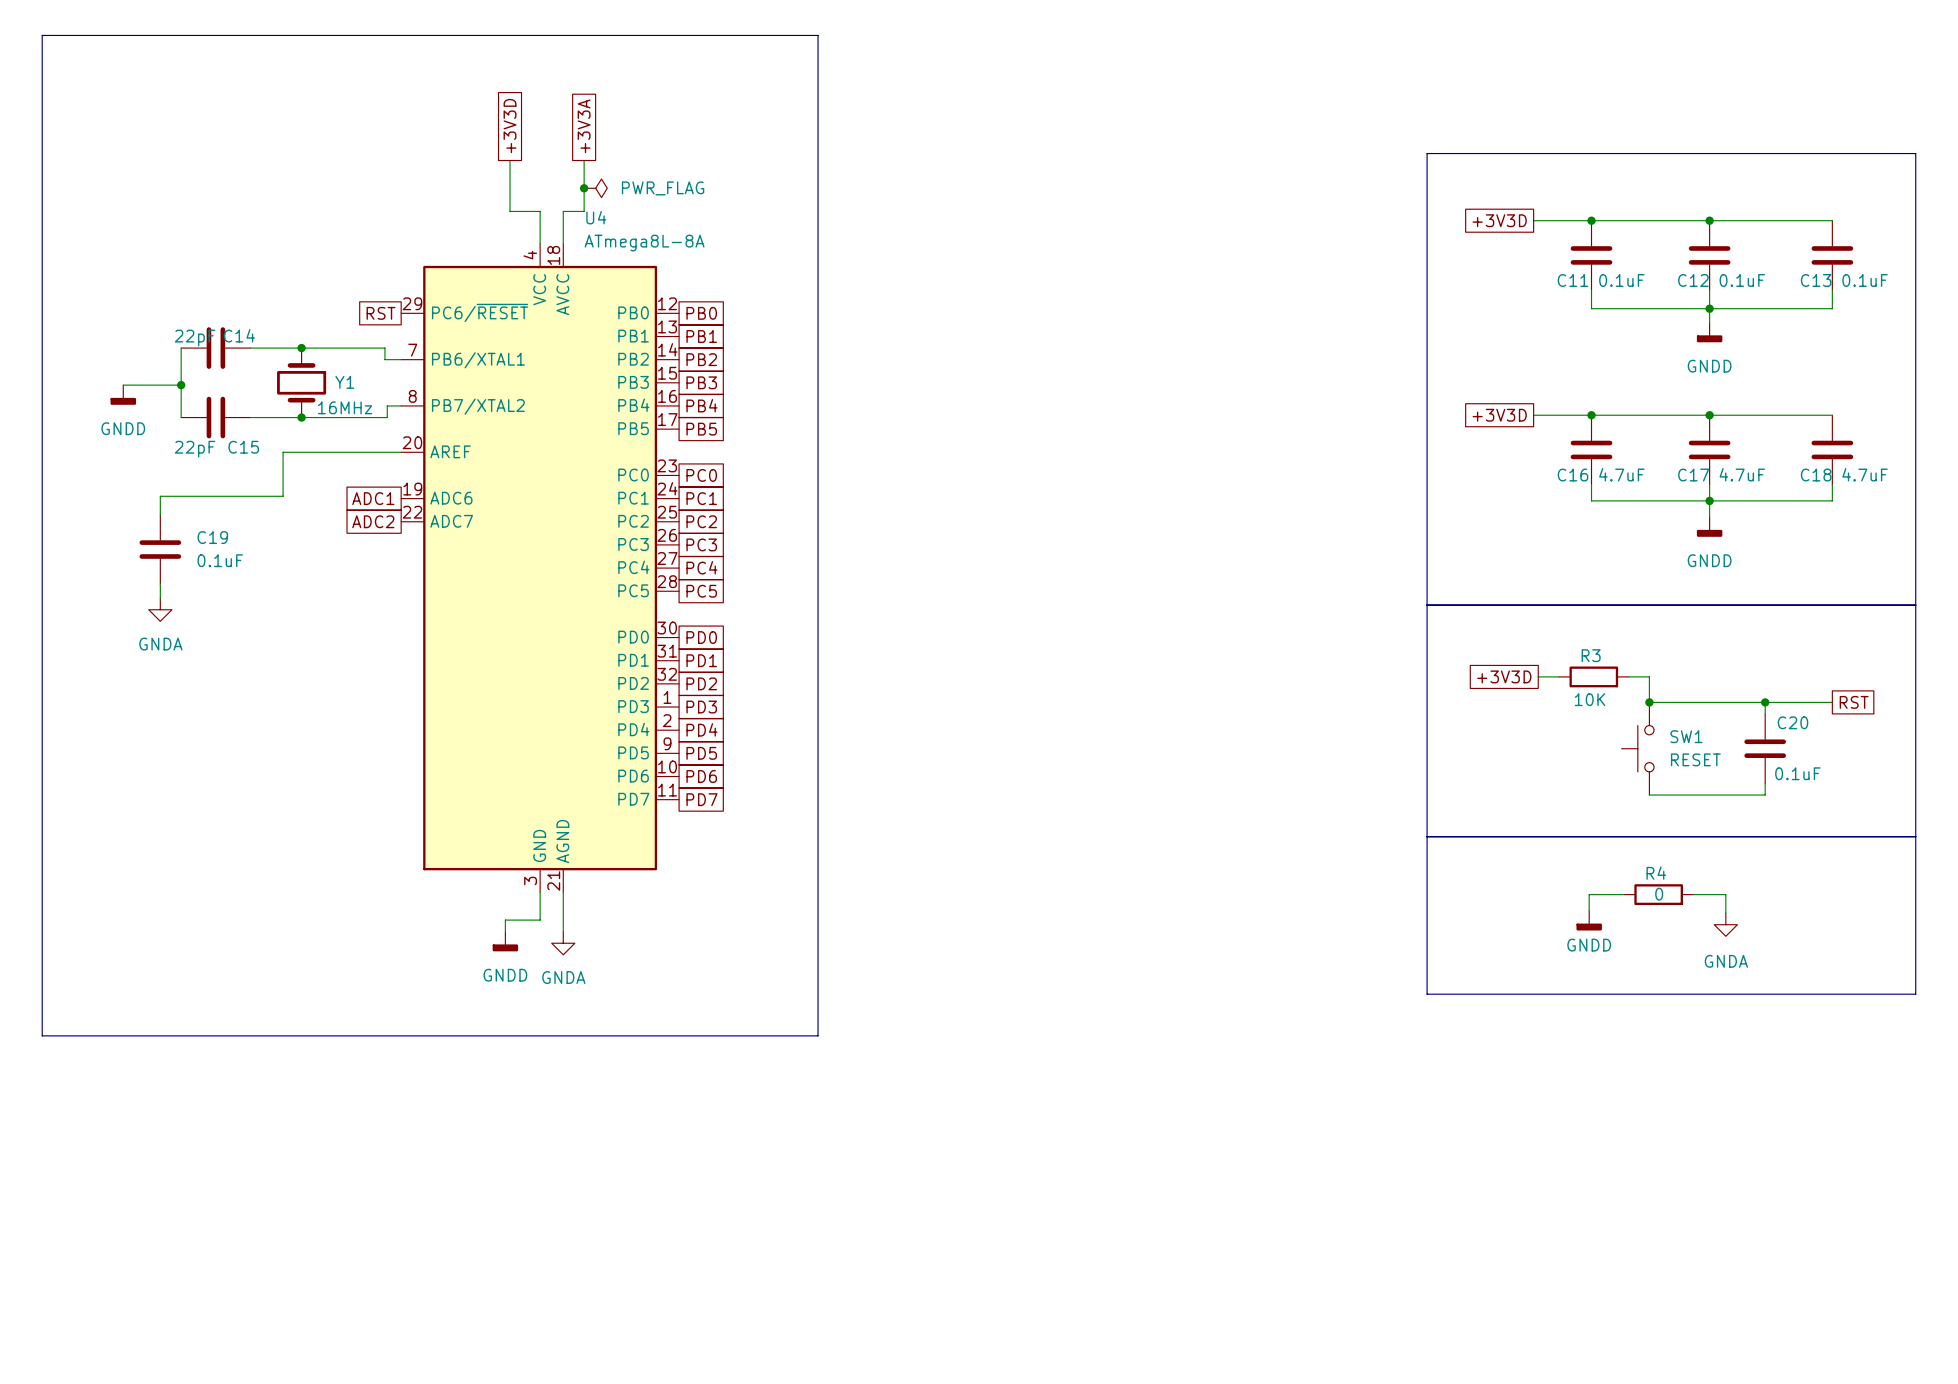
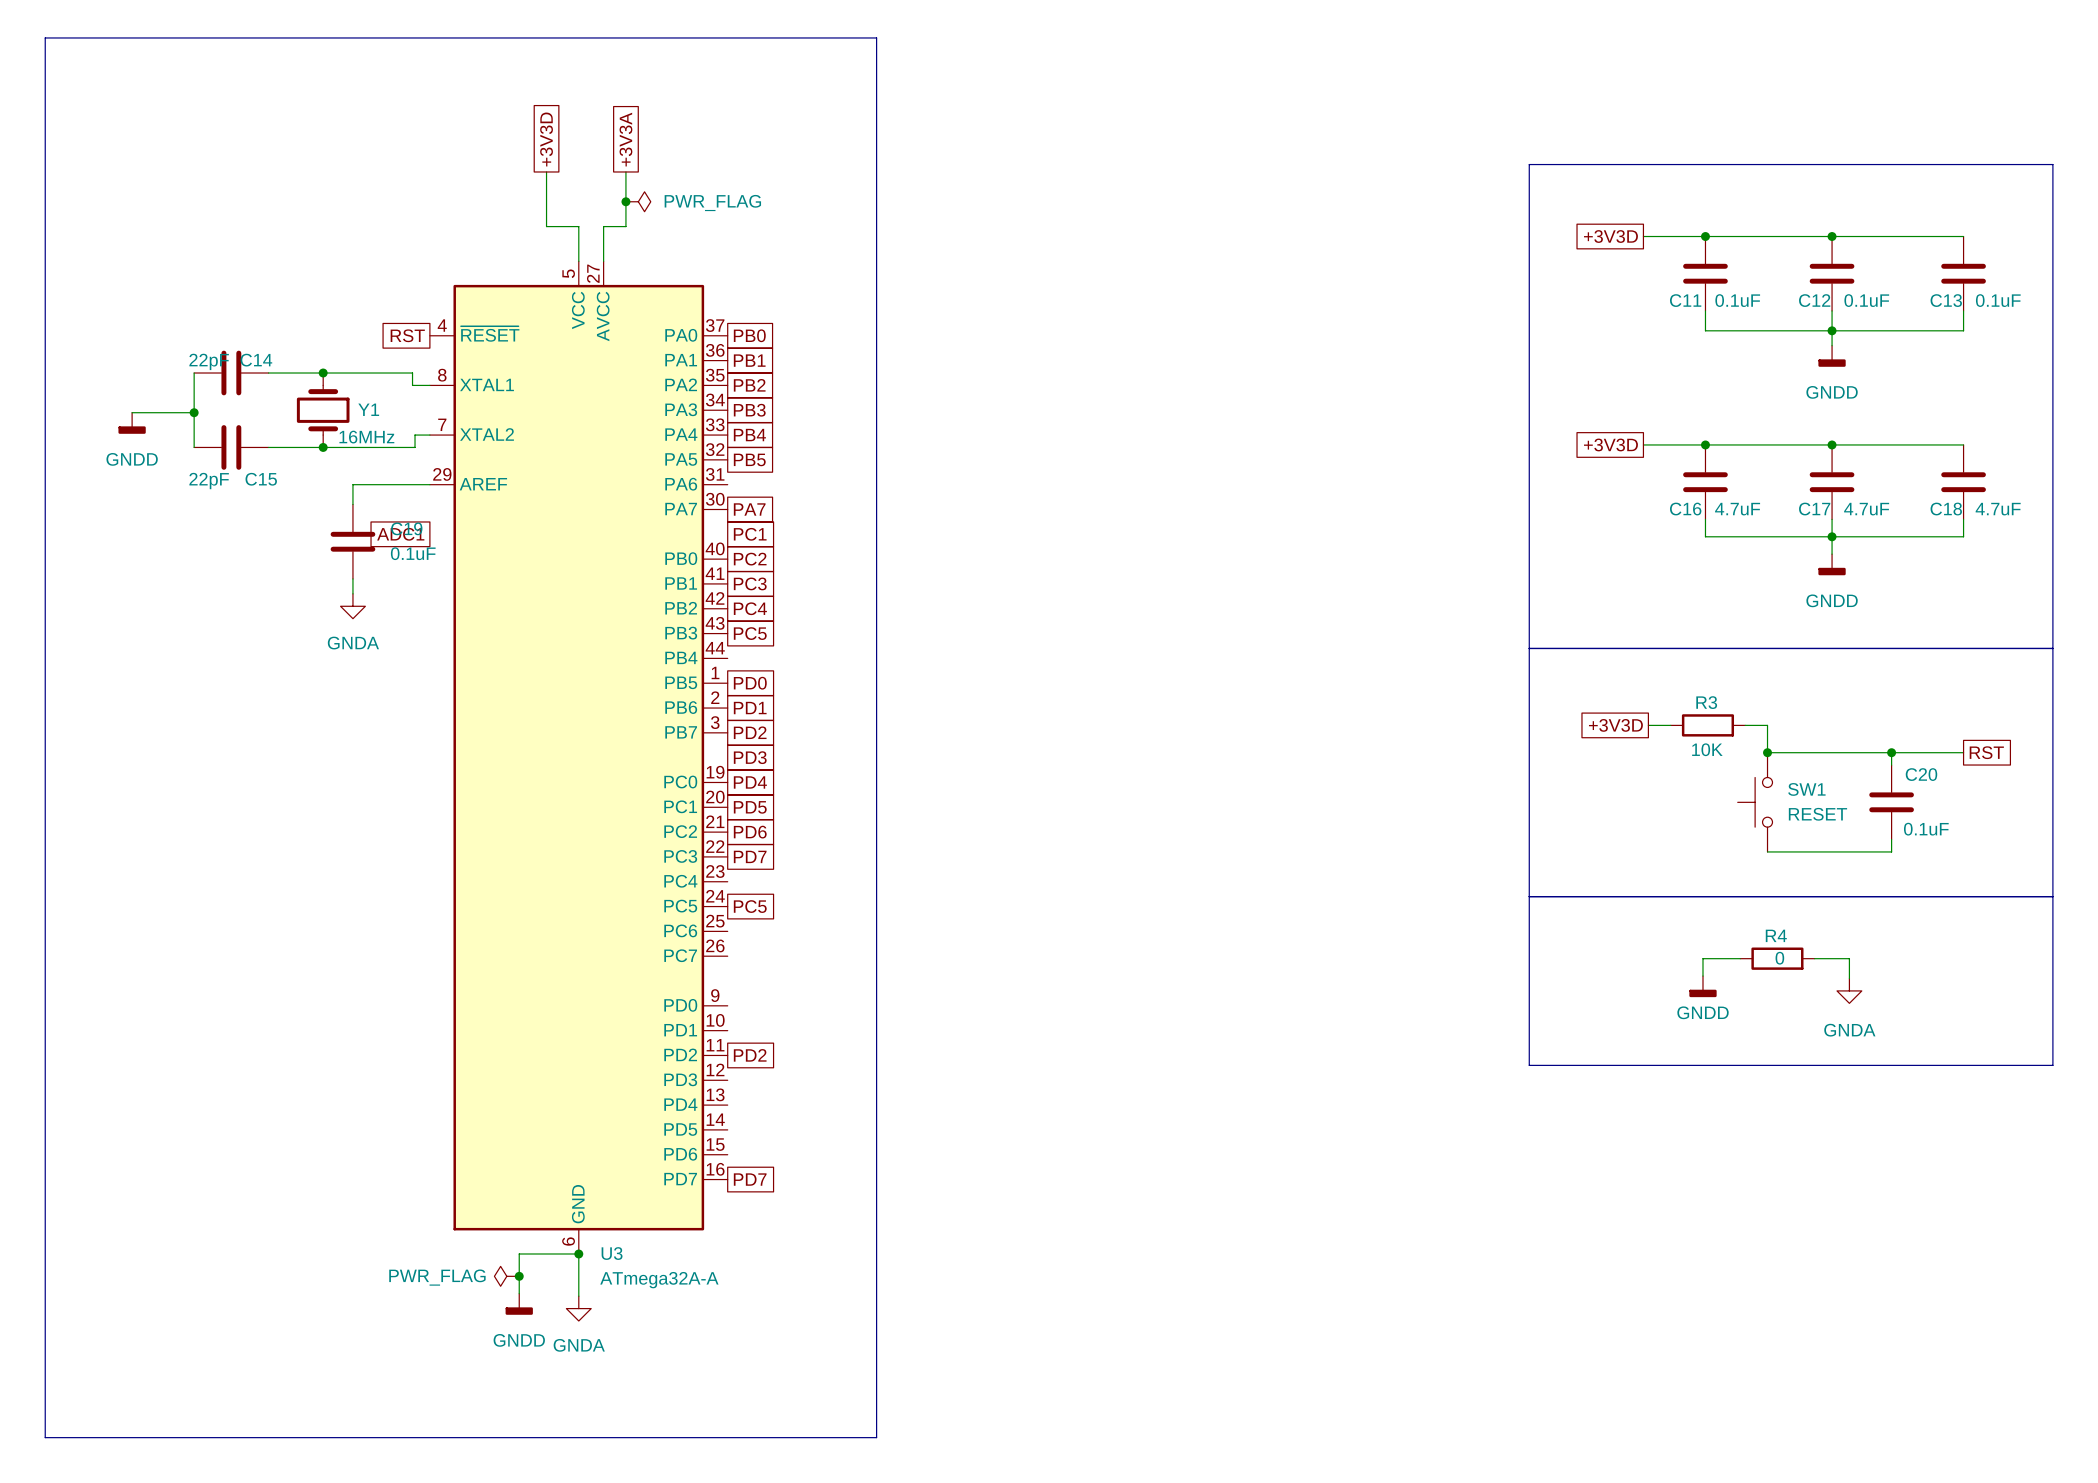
wire: (329, 452) (283, 452) (283, 496) (160, 496) (160, 514) -> (352, 484) (352, 504)
global label: PC0 (701, 475) -> PA7 (749, 509)
global label: ADC2 (373, 521) -> none
C19 position: (160, 549) -> (352, 541)
U4: ATmega8L-8A (540, 568) -> none
wire: (160, 584) (160, 598) -> (352, 578) (352, 593)
power symbol position: GNDA (160, 609) -> GNDA (352, 606)
U3: none -> ATmega32A-A (578, 757)
global label: none -> PC5 (750, 906)
power symbol: GNDD (505, 941) -> none
power symbol: GNDA (563, 943) -> none
global label: none -> PD2 (750, 1055)
line: (42, 1035) (818, 1035) -> (45, 1110) (45, 1437) (876, 1437) (876, 1110)
global label: none -> PD7 (750, 1179)
junction: none -> (578, 1253)
power symbol: none -> PWR_FLAG (506, 1276)
junction: none -> (519, 1276)
wire: none -> (519, 1293) (519, 1253) (578, 1253) (578, 1296)
power symbol: none -> GNDD (519, 1304)
power symbol: none -> GNDA (578, 1308)

